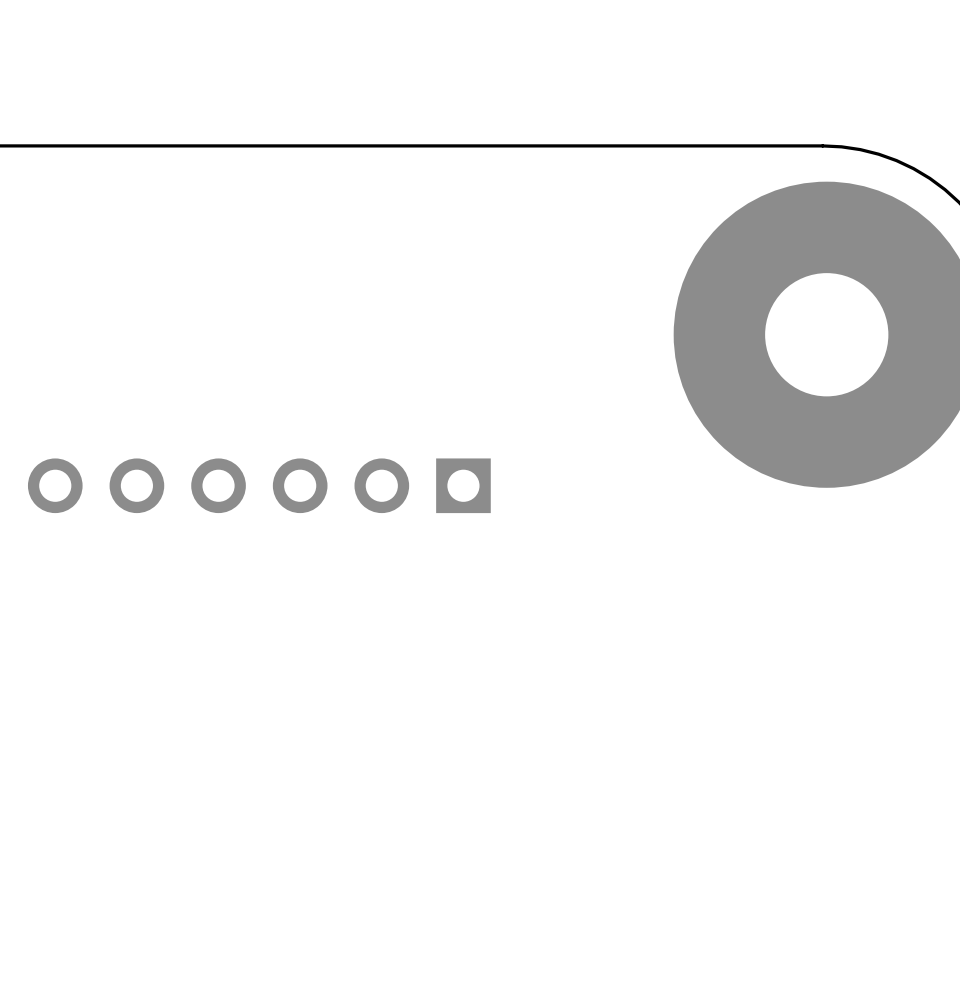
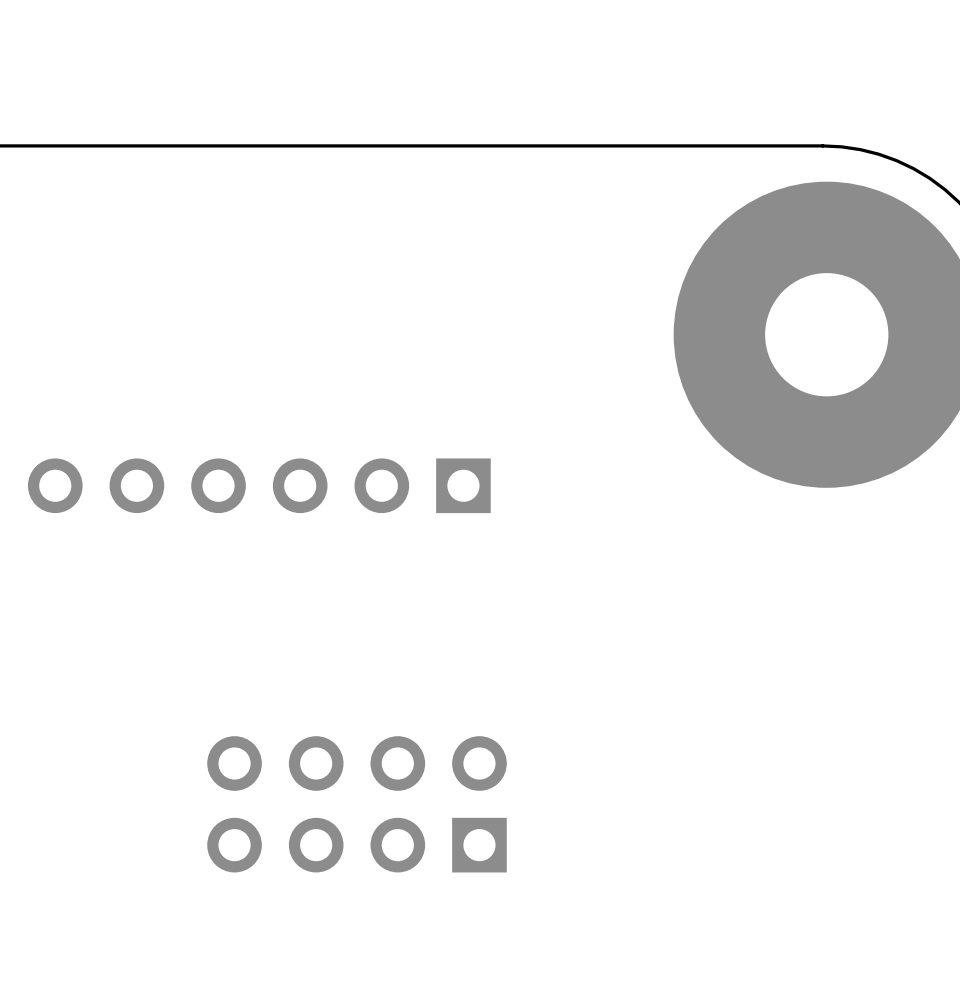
part: none -> (357, 804)

